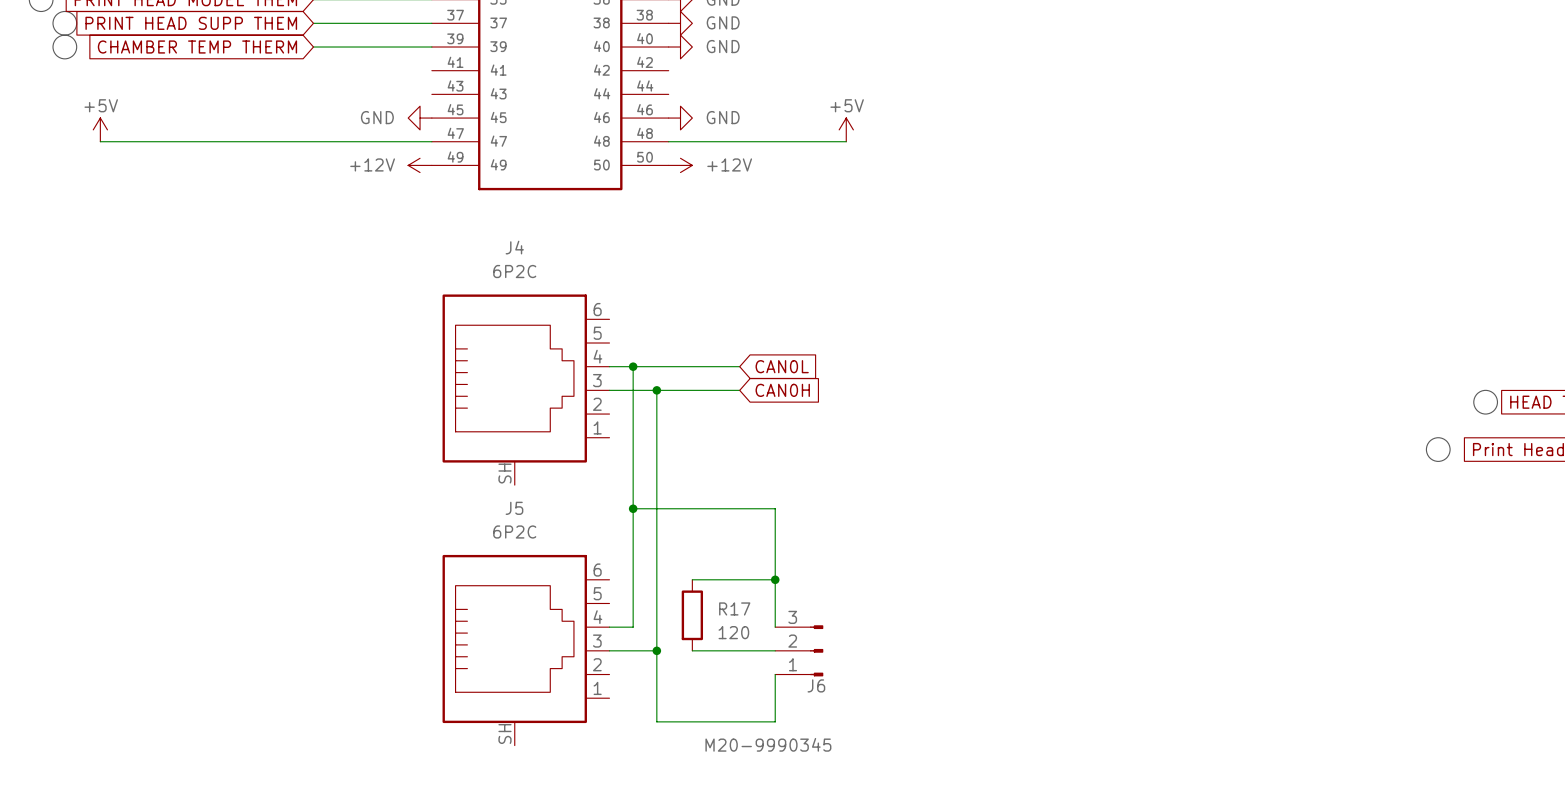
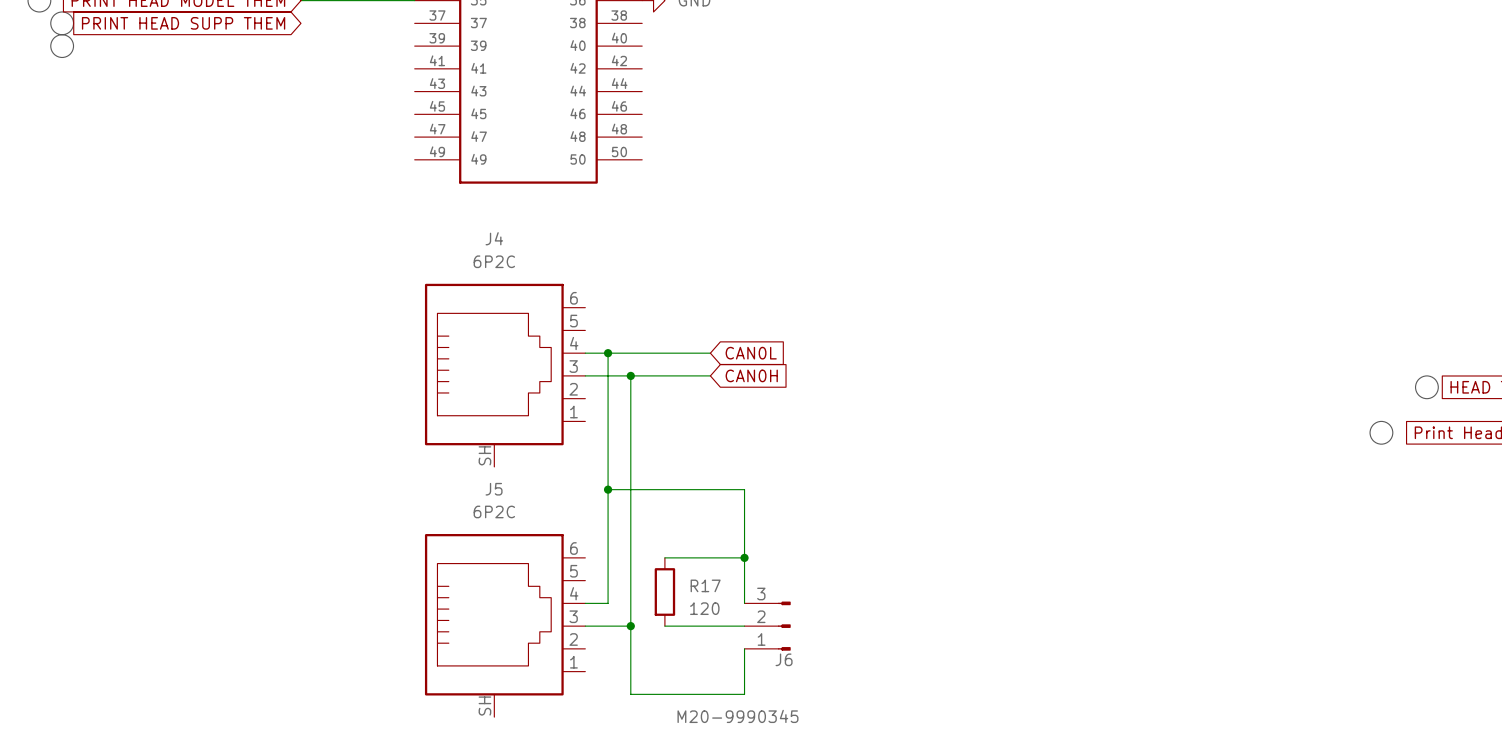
wire: (313, 23) (431, 23) -> none
power symbol: GND (680, 23) -> none
global label: CHAMBER TEMP THERM (197, 47) -> none
wire: (313, 47) (431, 47) -> none
power symbol: GND (680, 47) -> none
power symbol: GND (420, 118) -> none
power symbol: GND (680, 118) -> none
power symbol: +5V (100, 129) -> none
power symbol: +5V (846, 129) -> none
wire: (100, 141) (431, 141) -> none
wire: (668, 141) (846, 141) -> none
power symbol: +12V (420, 165) -> none
power symbol: +12V (680, 165) -> none

